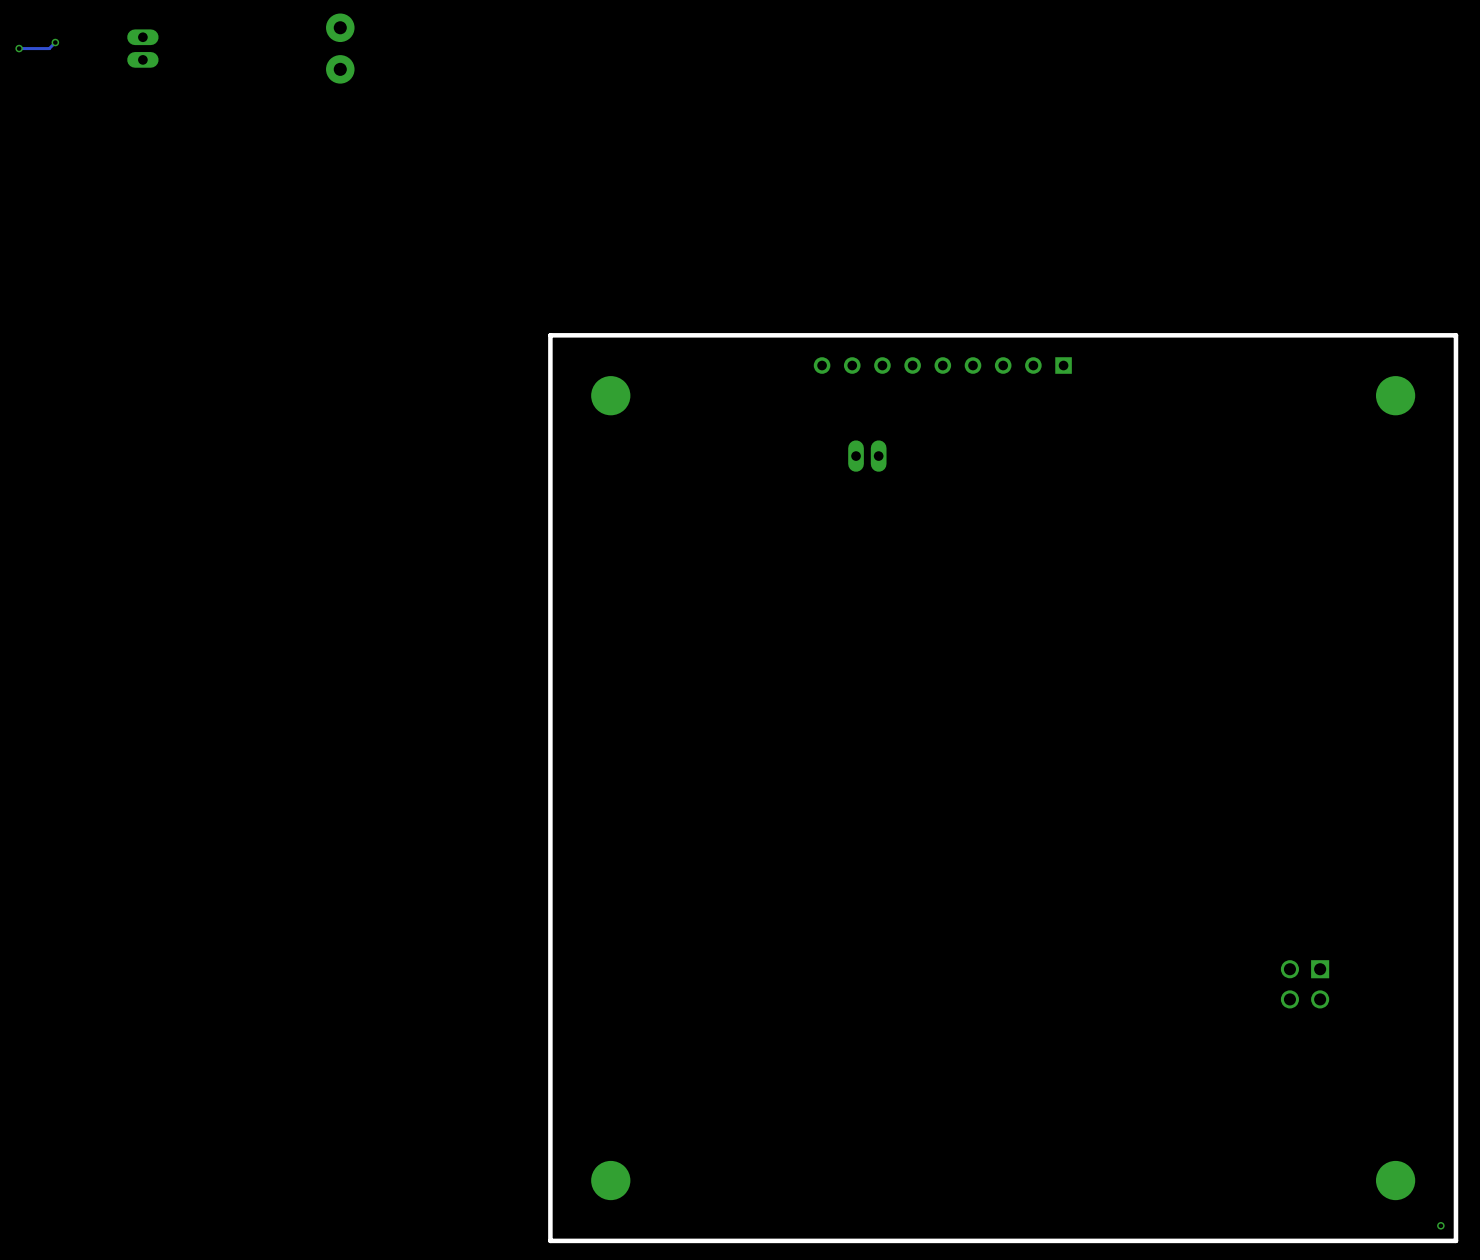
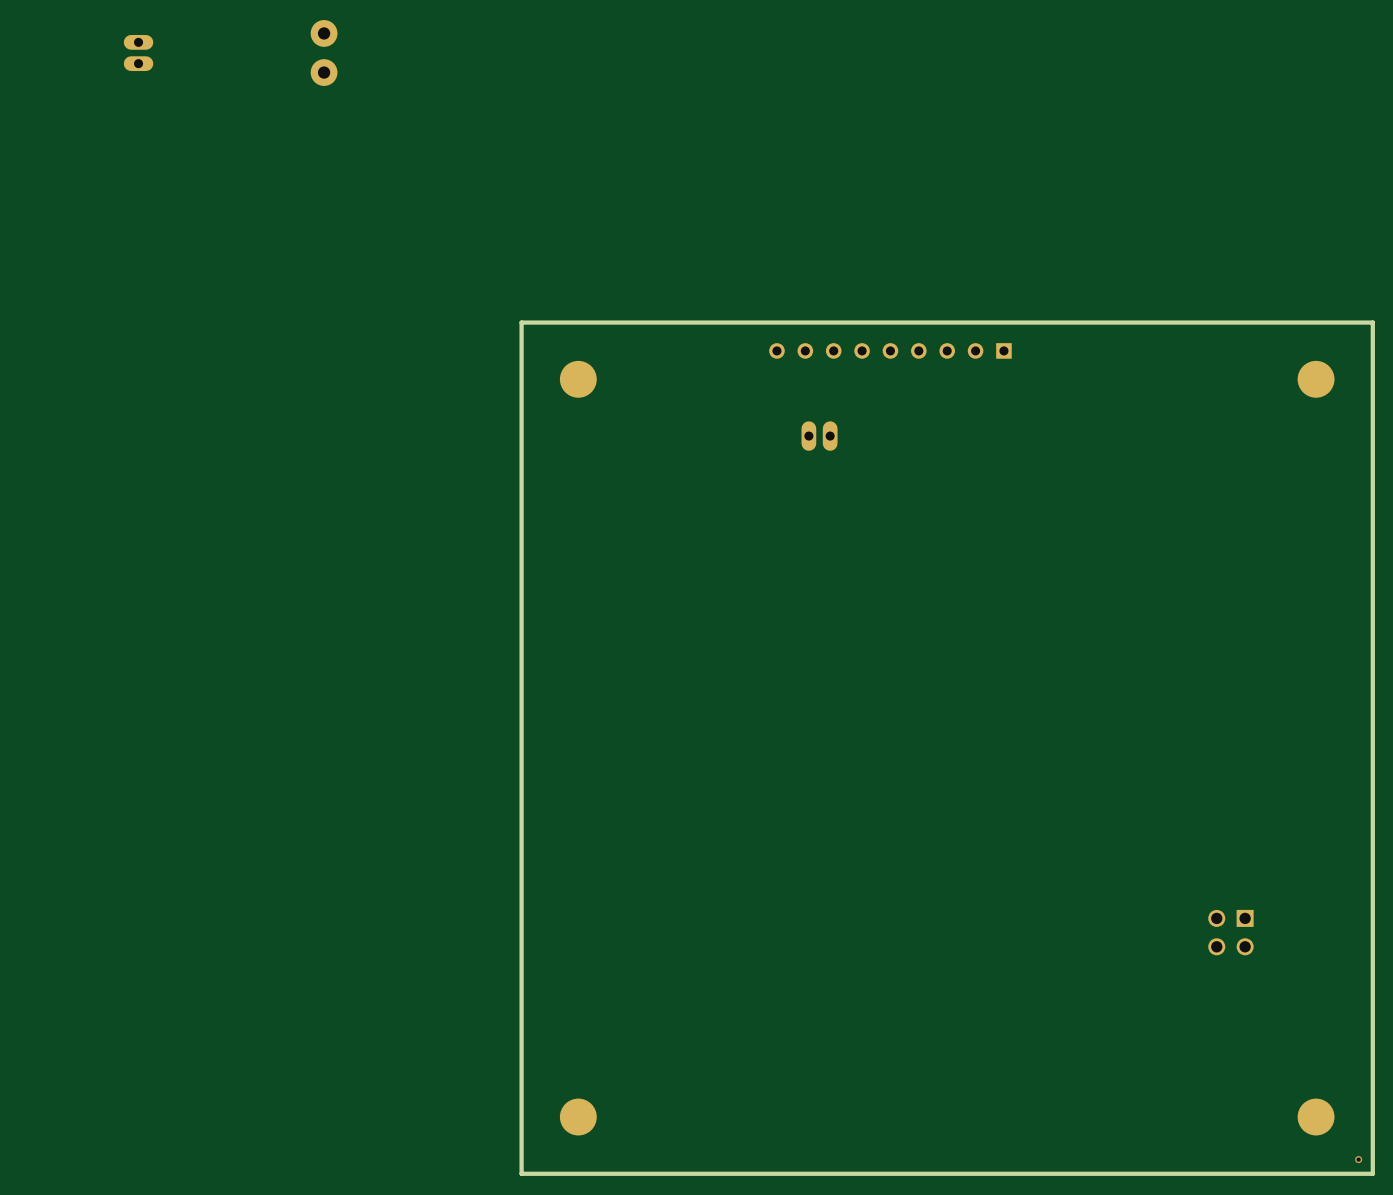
track: (55, 42) (49, 48) (19, 48) -> none
via: (55, 42) -> none
via: (19, 48) -> none

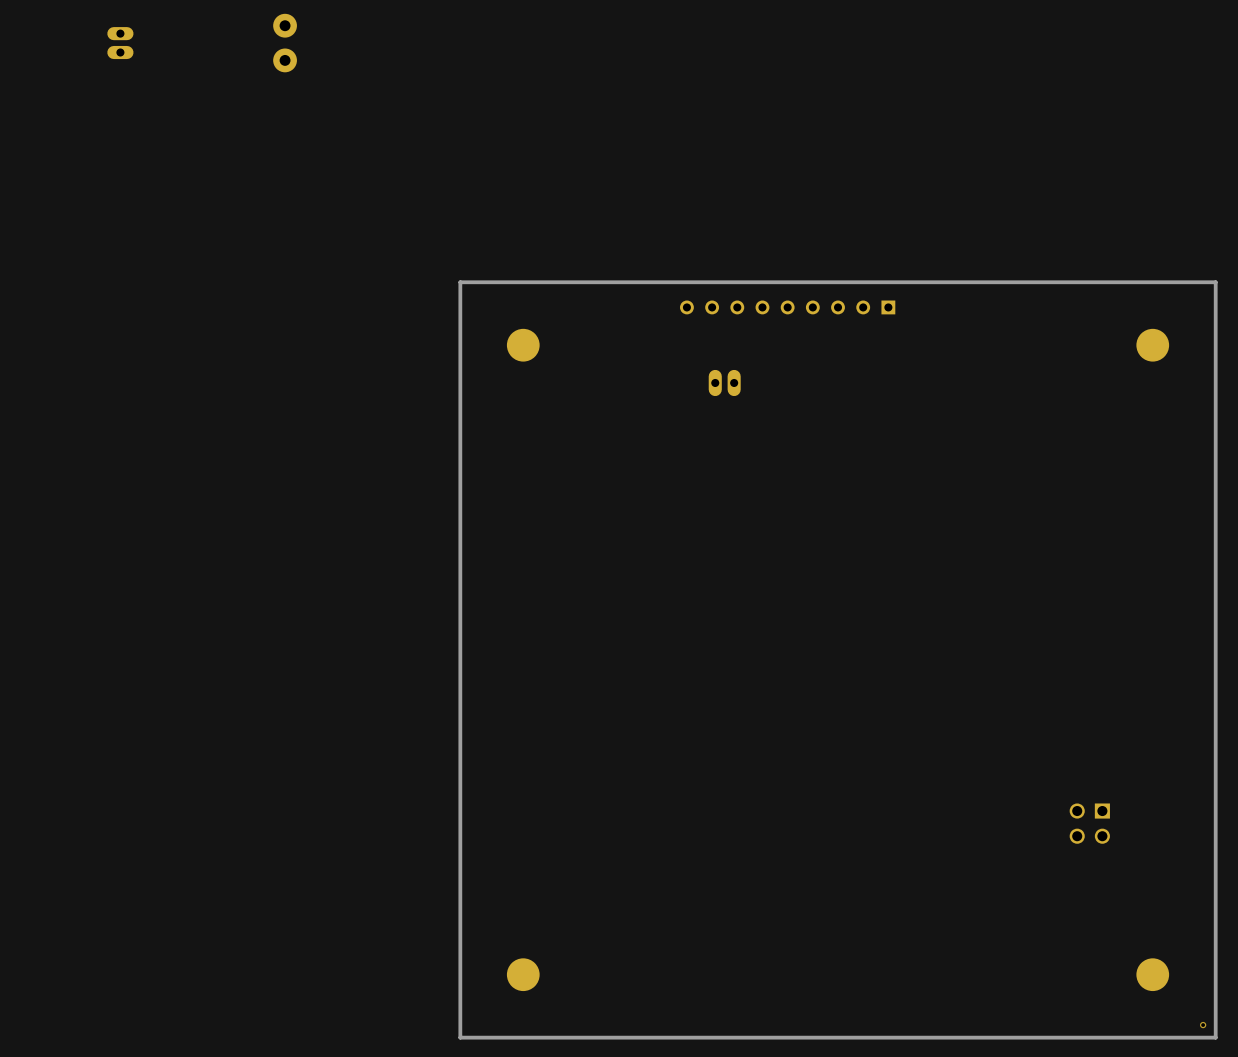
part position: (578, 379) -> (523, 345)
part position: (1316, 379) -> (1152, 345)
part position: (578, 1117) -> (523, 974)
part position: (1316, 1117) -> (1152, 974)

